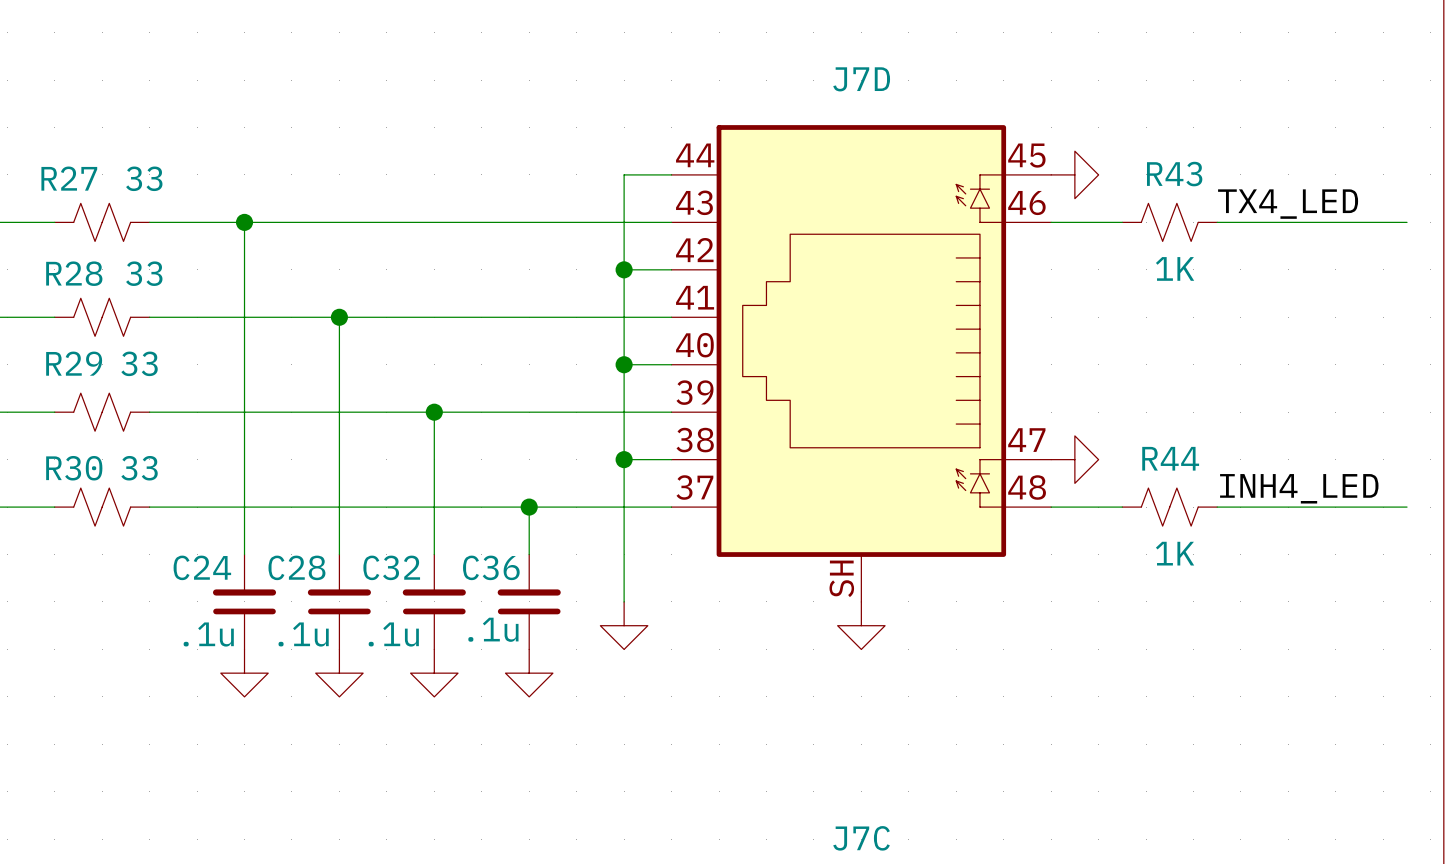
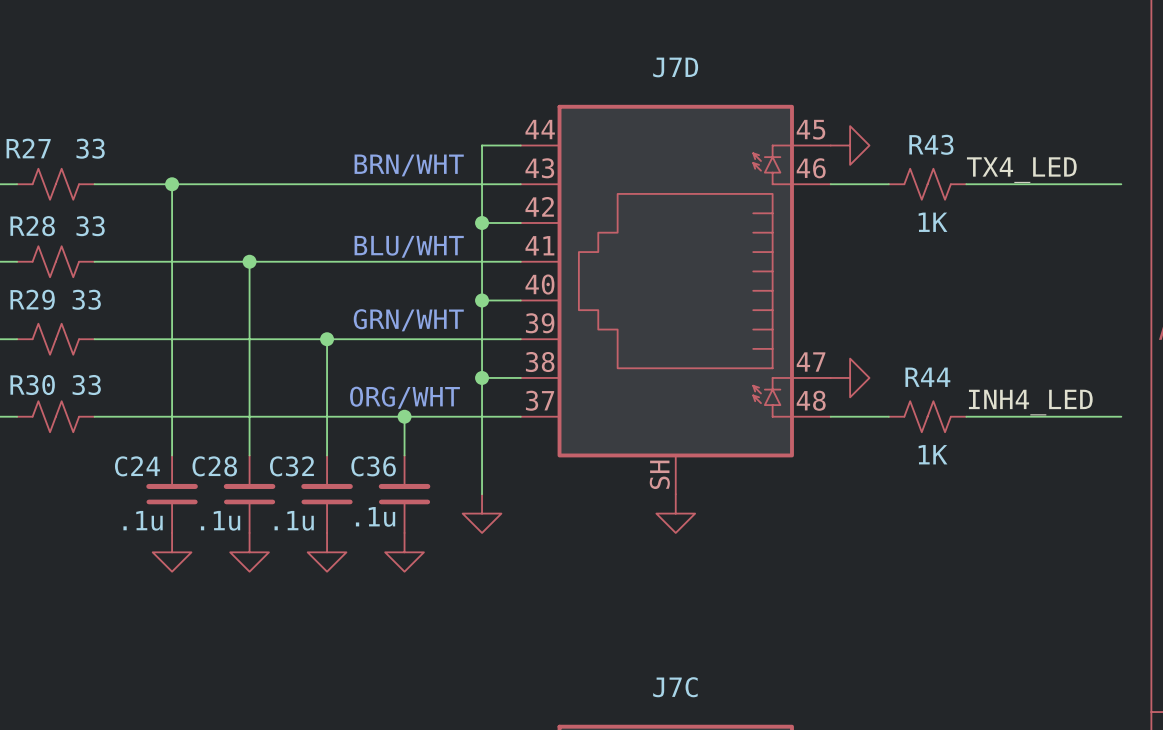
text: none -> BRN/WHT (409, 165)
text: none -> BLU/WHT (409, 246)
text: none -> GRN/WHT (408, 320)
text: none -> ORG/WHT (405, 397)

